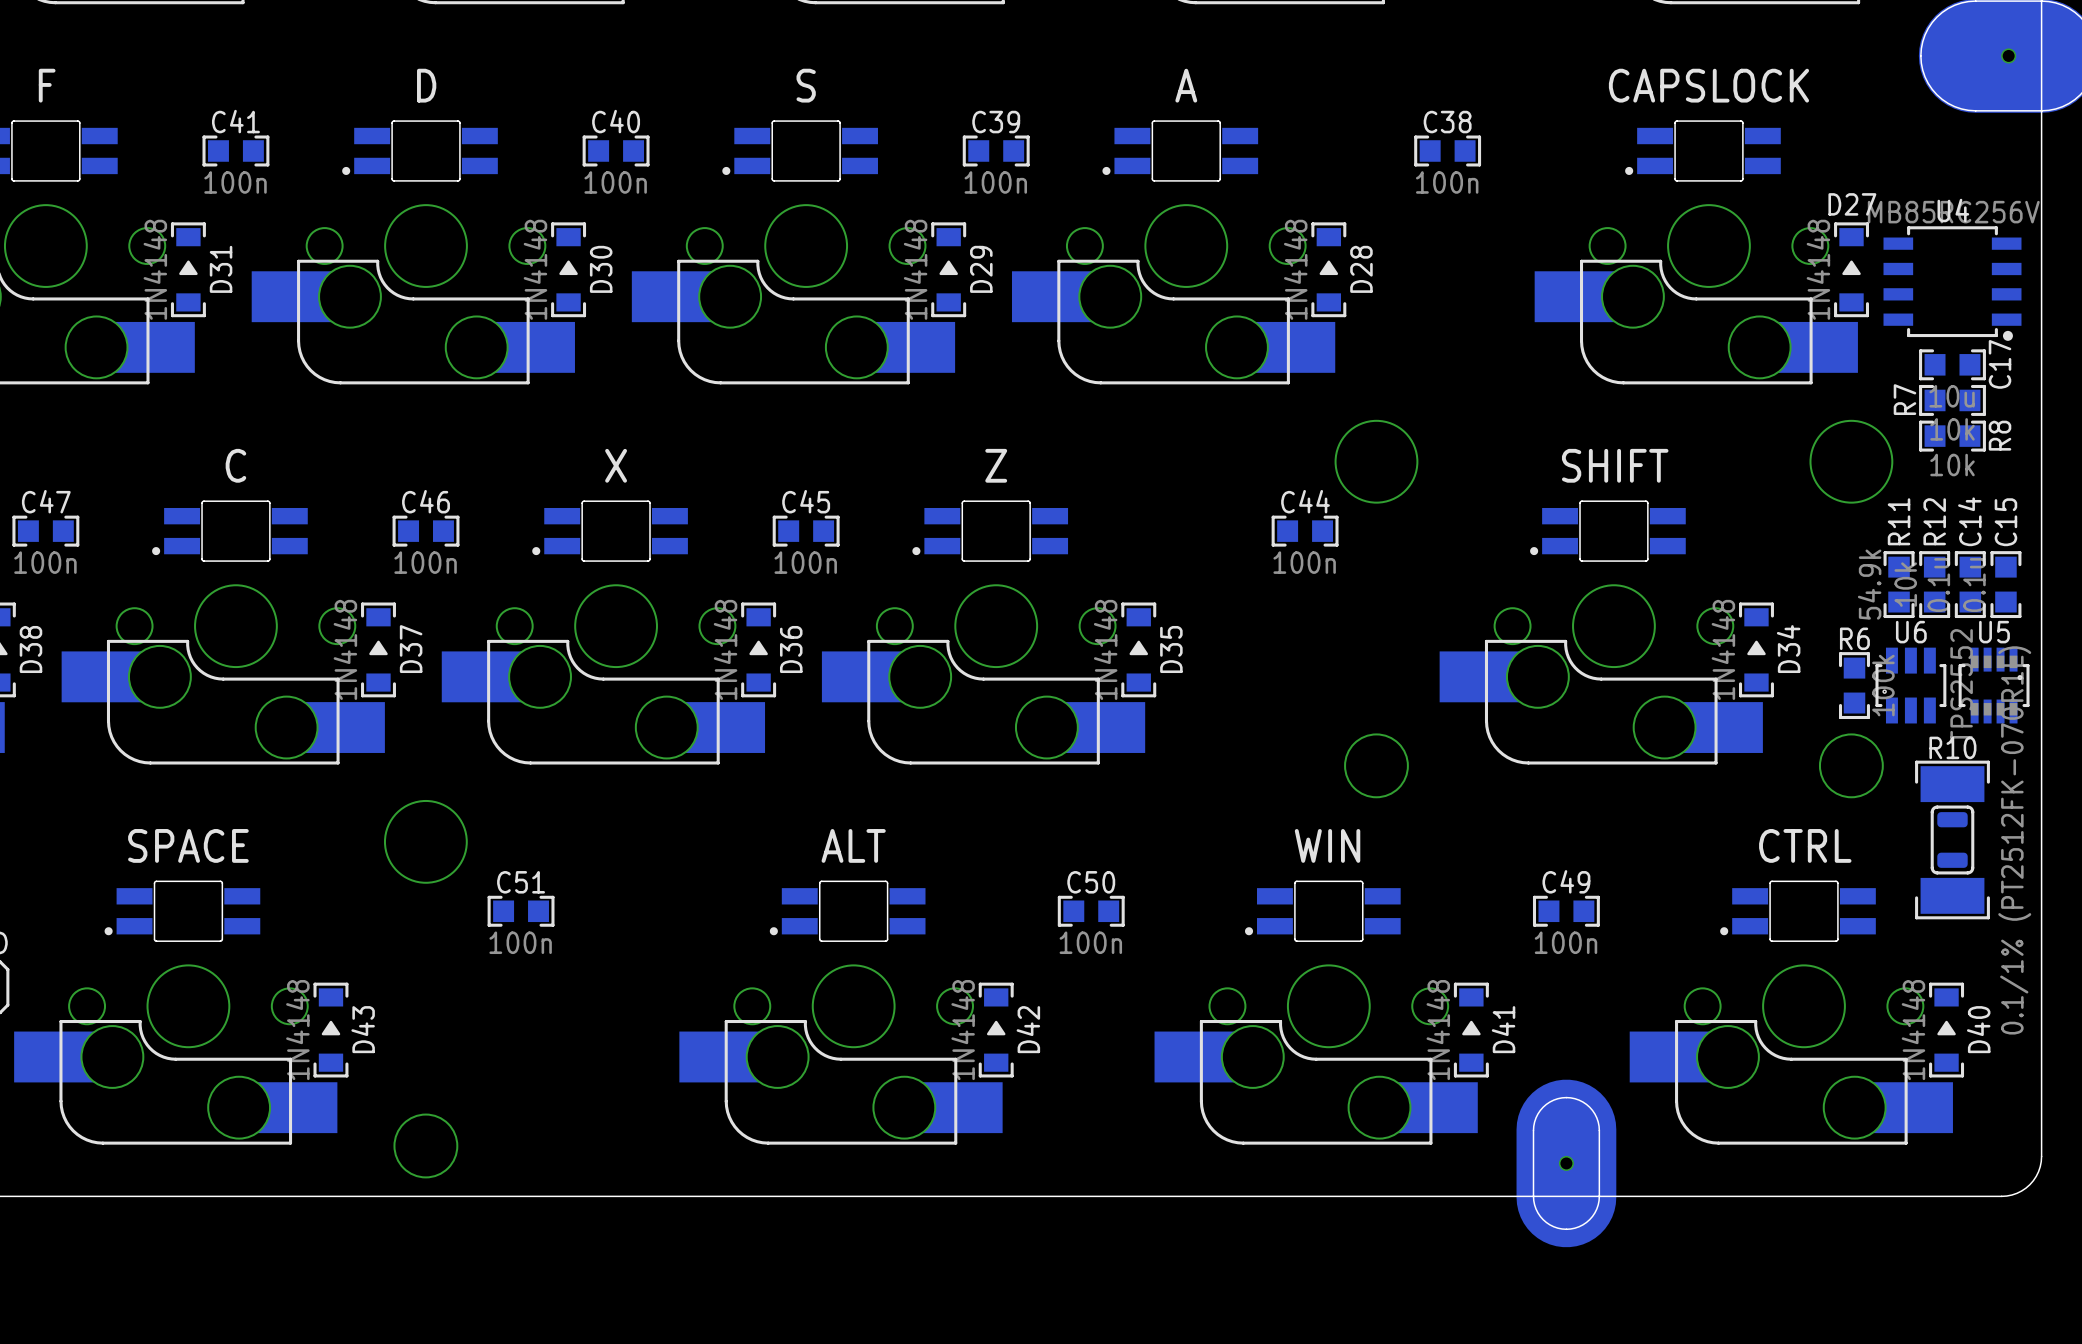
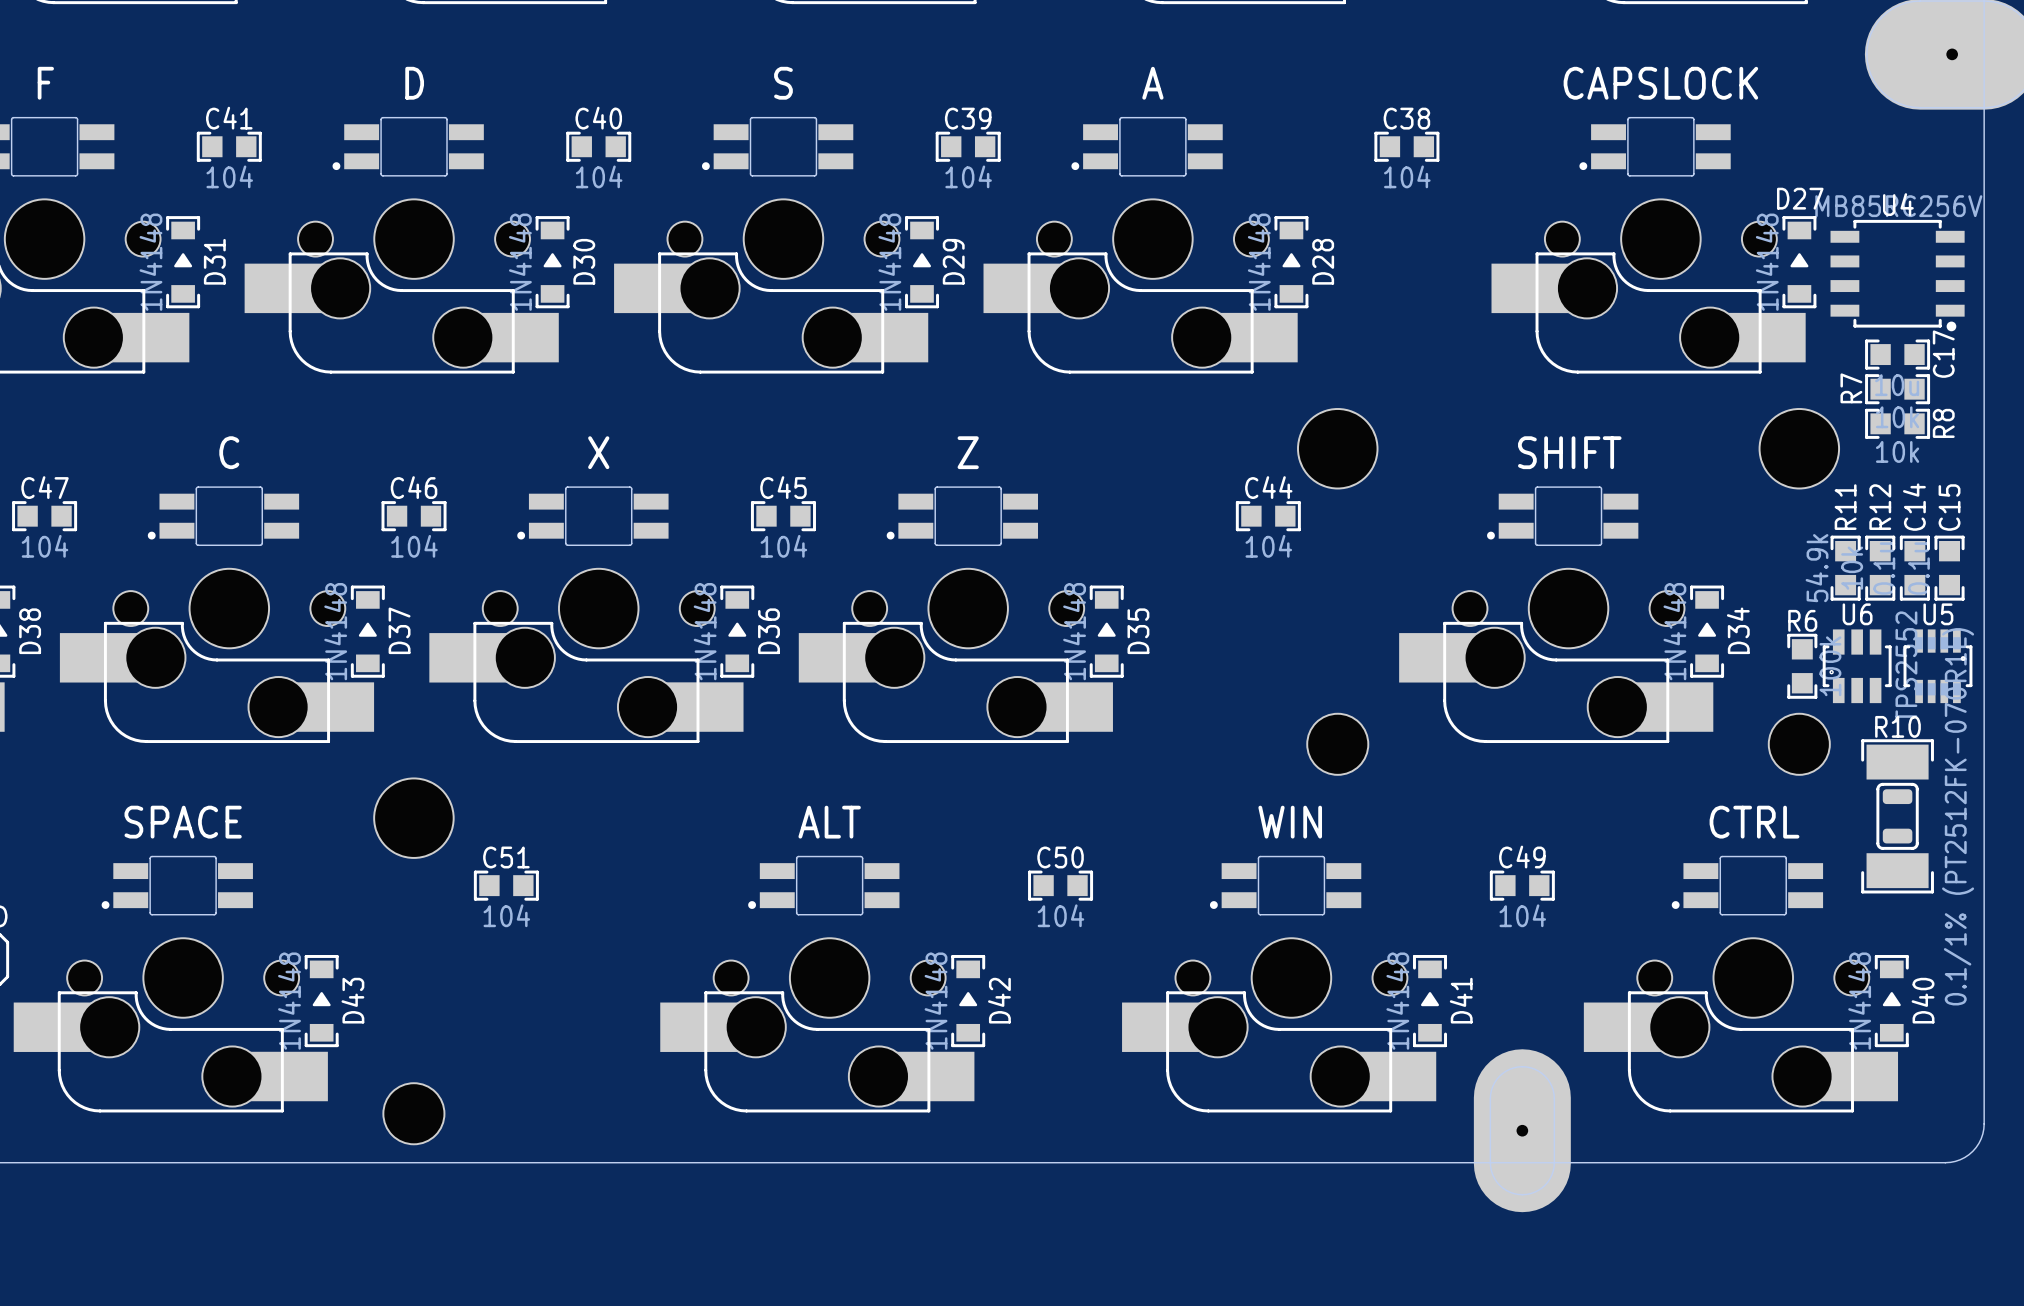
C41 value: 100n (235, 182) -> 104 (229, 176)
C40 value: 100n (615, 182) -> 104 (599, 176)
C39 value: 100n (995, 182) -> 104 (968, 176)
C38 value: 100n (1447, 182) -> 104 (1407, 176)
C47 value: 100n (45, 562) -> 104 (45, 546)
C46 value: 100n (425, 562) -> 104 (414, 546)
C45 value: 100n (805, 562) -> 104 (783, 546)
C44 value: 100n (1304, 562) -> 104 (1268, 546)
C51 value: 100n (520, 942) -> 104 (506, 915)
C50 value: 100n (1090, 942) -> 104 (1060, 915)
C49 value: 100n (1565, 942) -> 104 (1522, 915)

